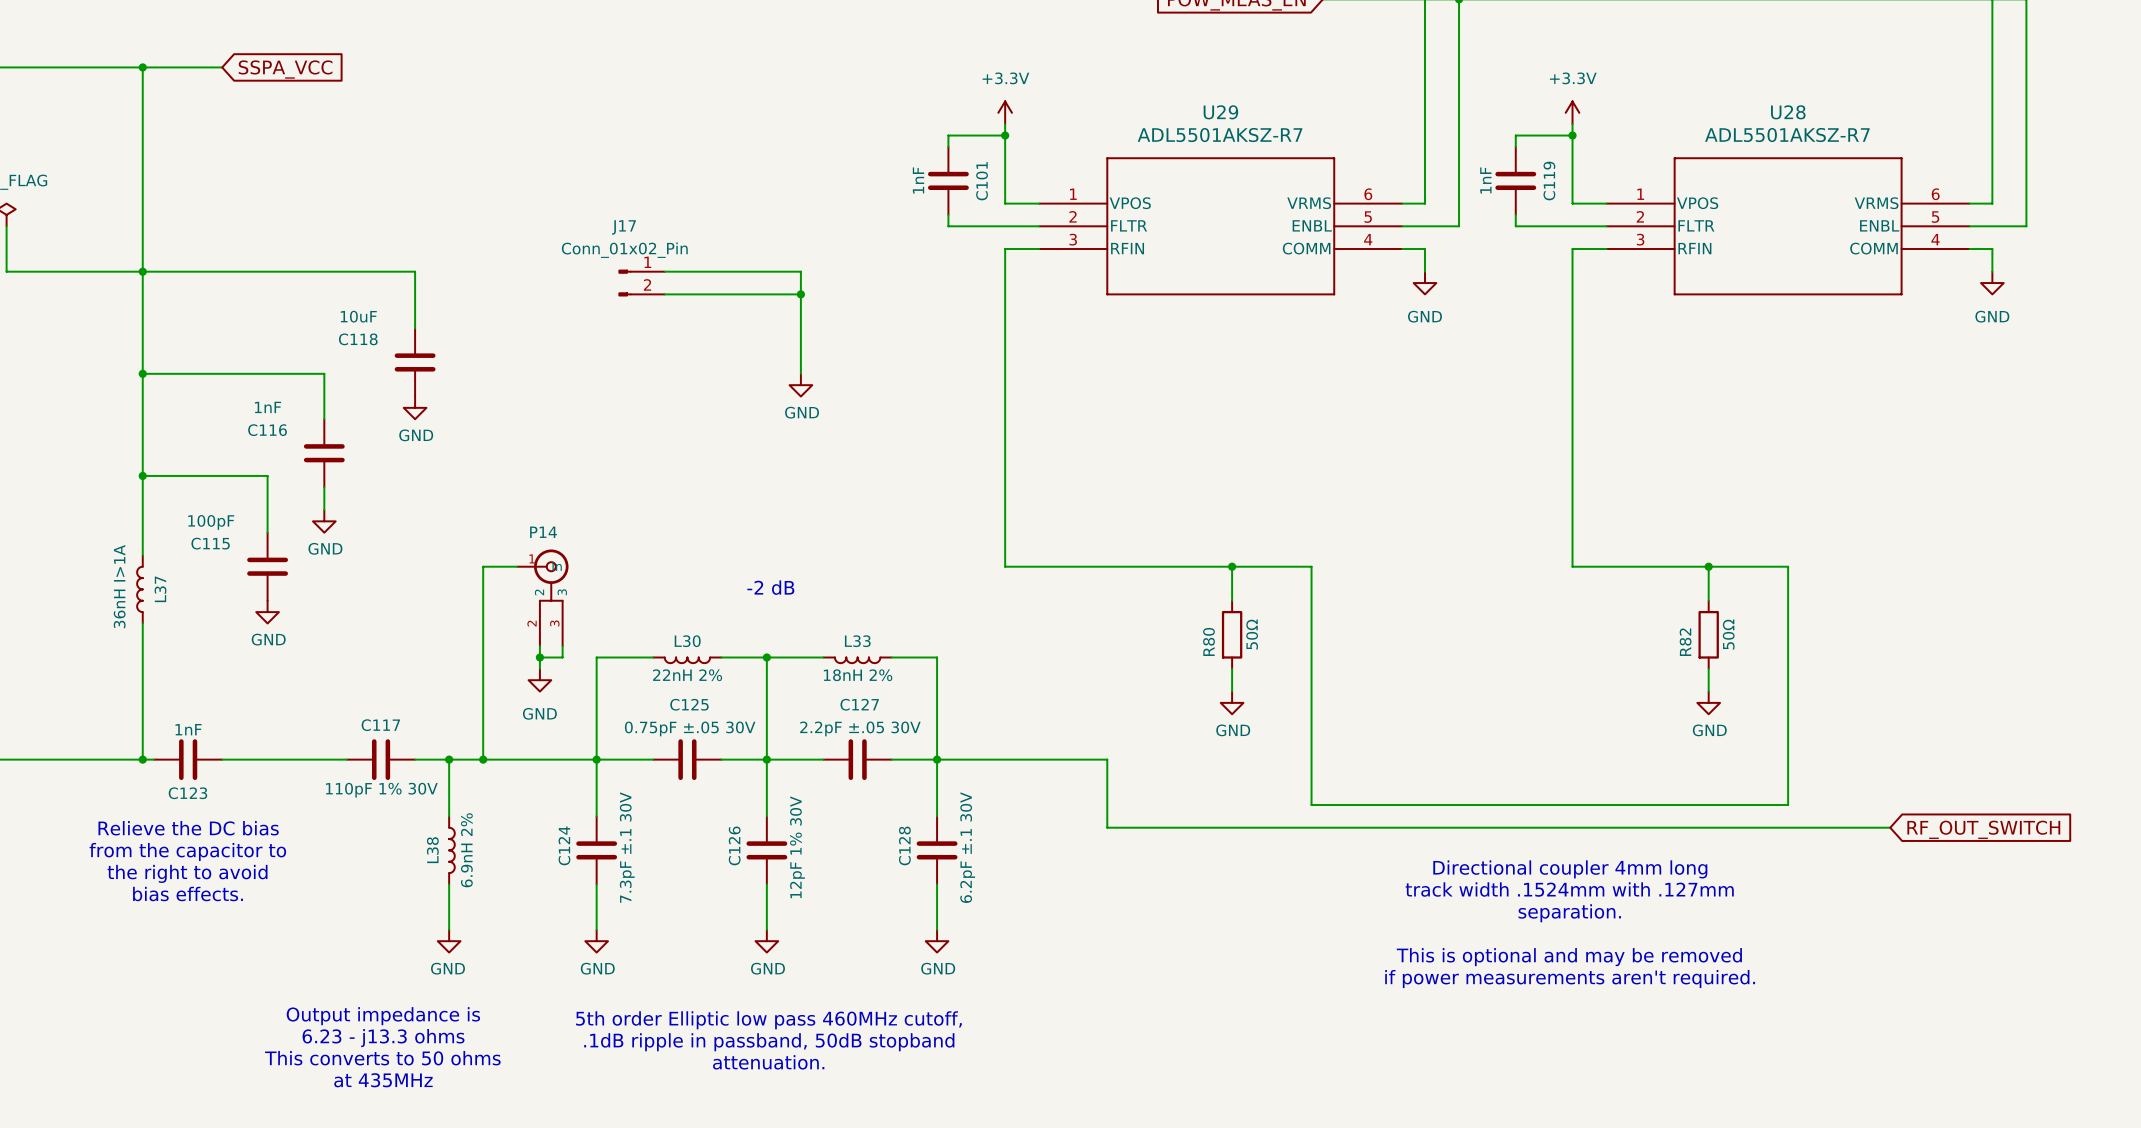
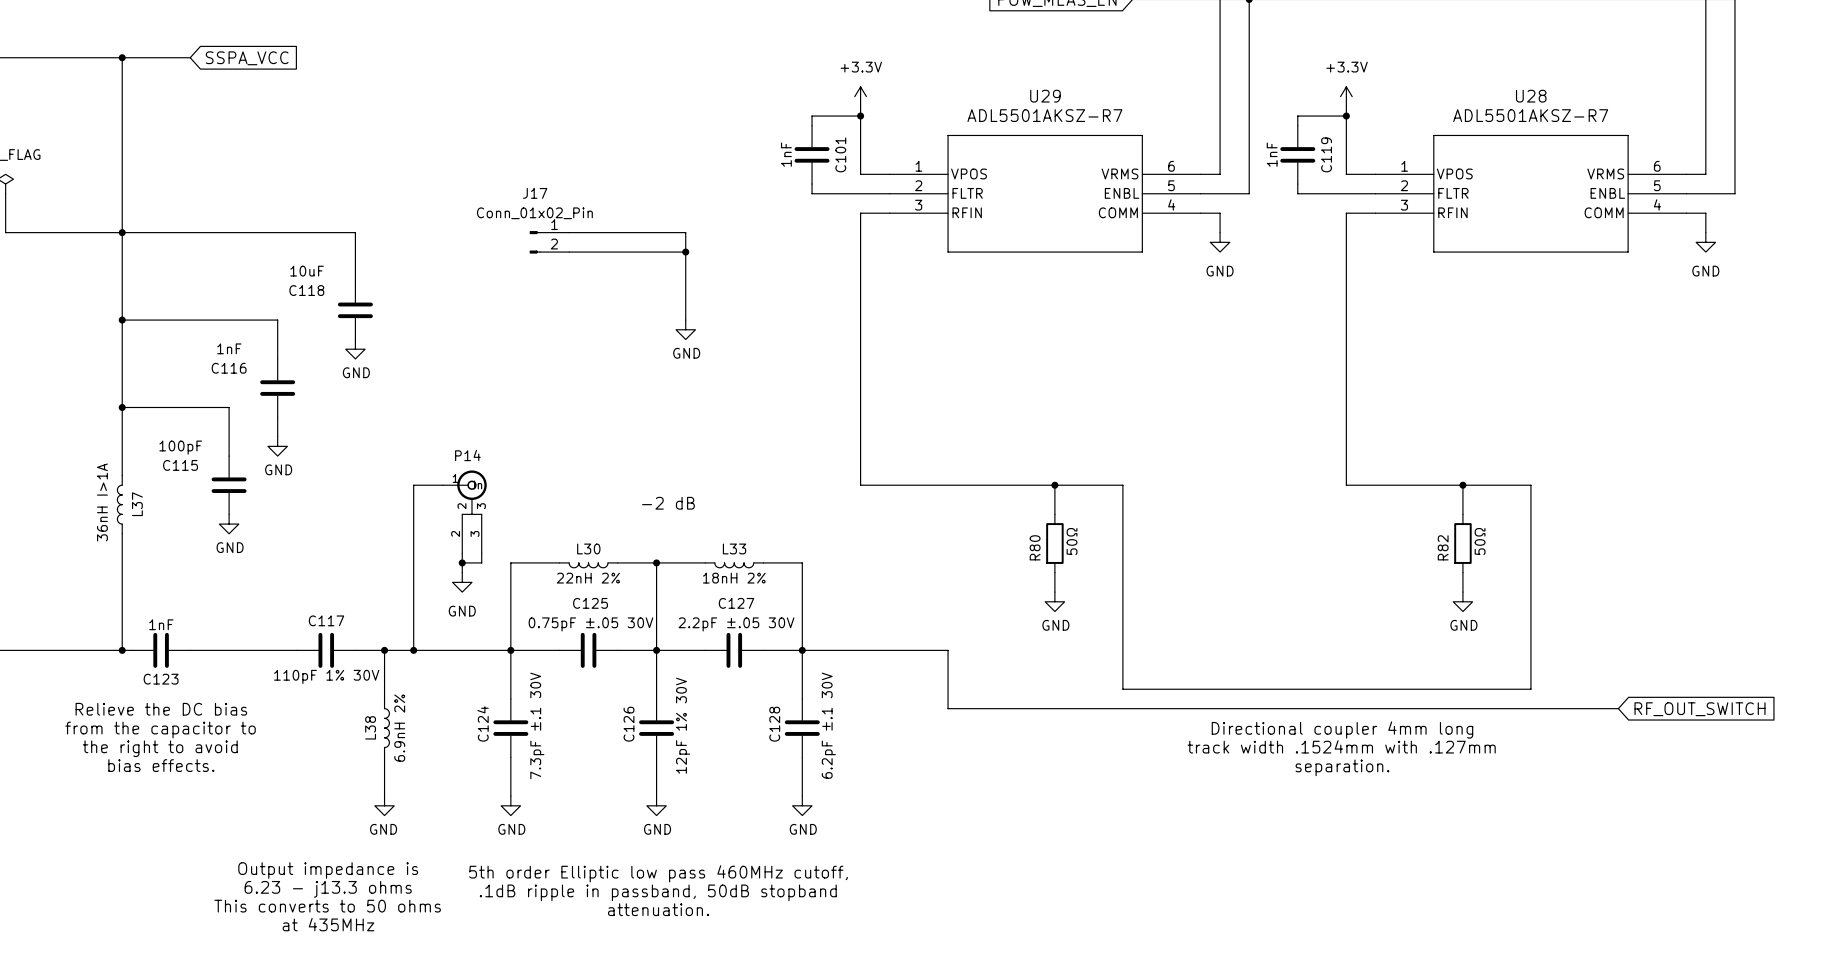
text: none -> Directional coupler 4mm long (1342, 730)
text: Directional coupler 4mm long (1570, 869) -> track width .1524mm with .127mm (1341, 746)
text: track width .1524mm with .127mm (1569, 889) -> separation. (1342, 767)
text: separation. (1569, 913) -> none
text: This is optional and may be removed (1569, 957) -> none
text: if power measurements aren't required. (1570, 979) -> none

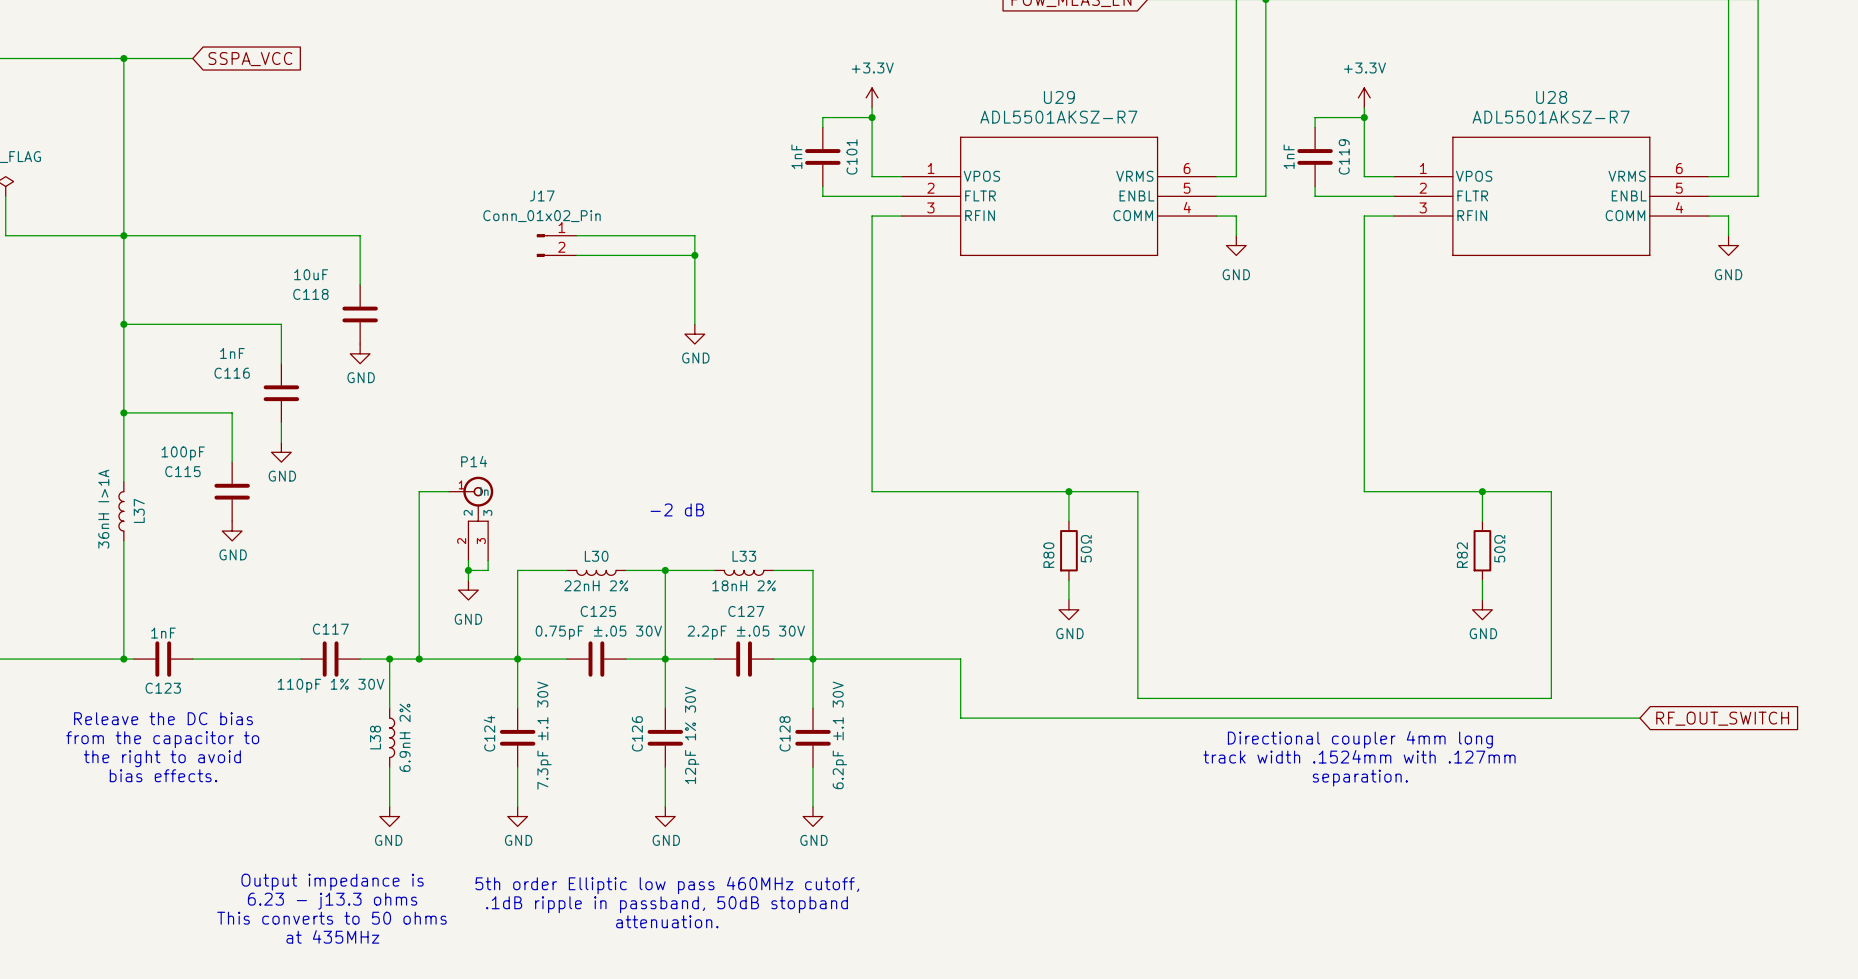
text: Relieve the DC bias (161, 709) -> Releave the DC bias (163, 718)

